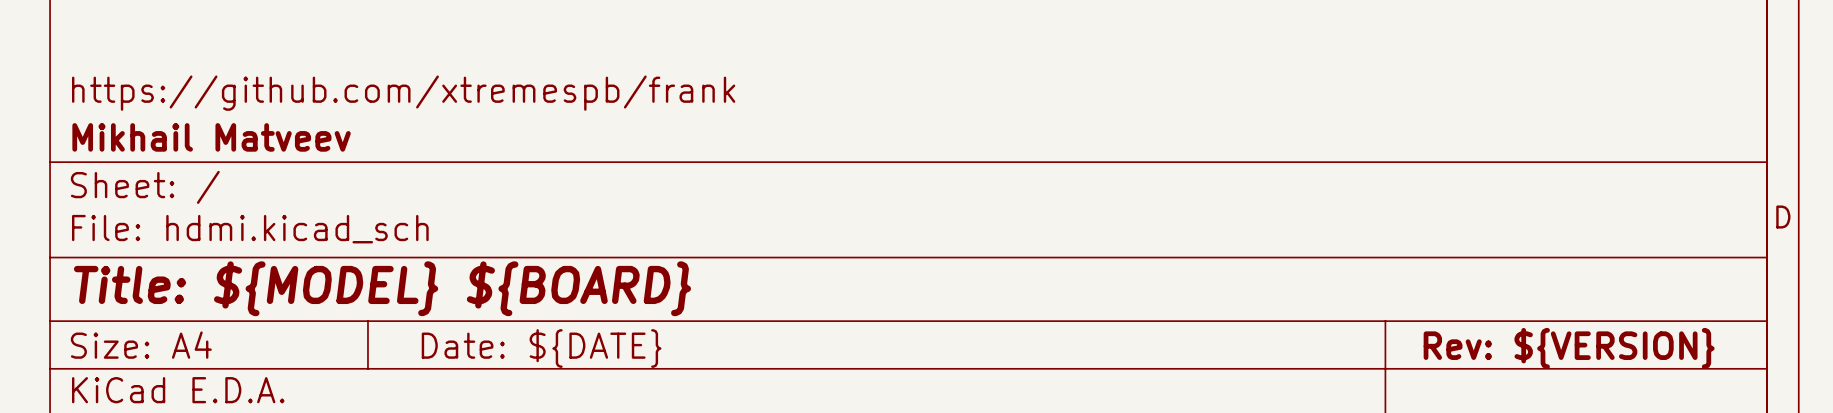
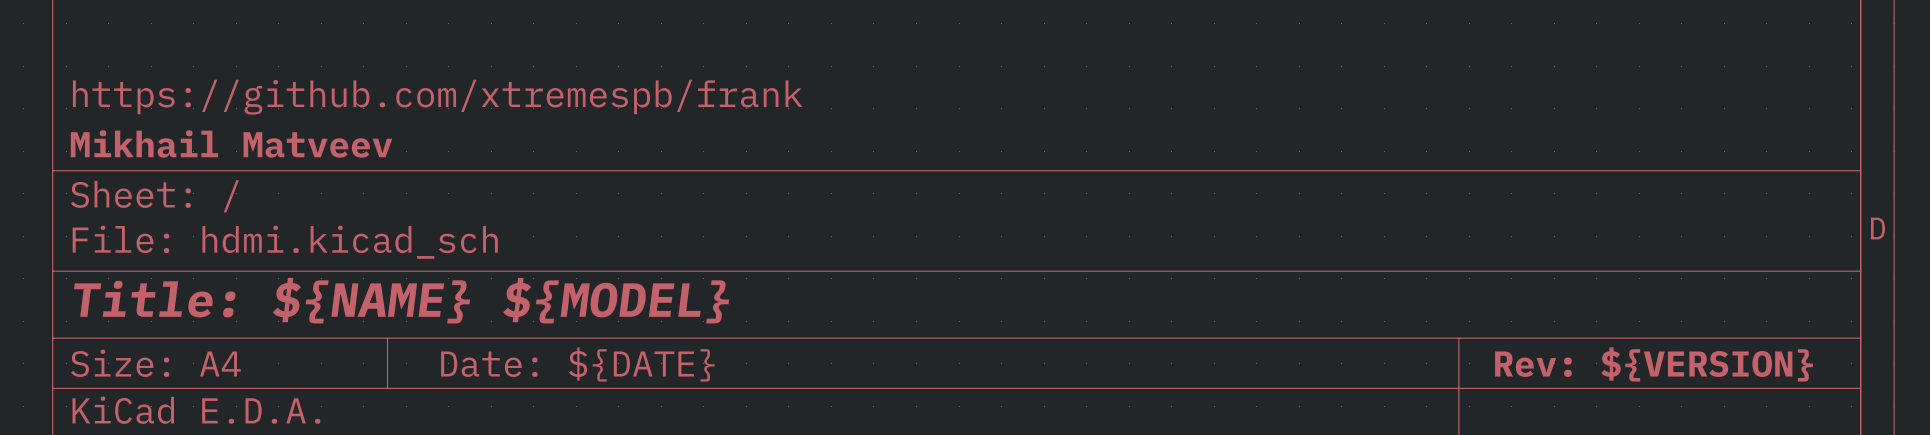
title block: Title: ${MODEL} ${BOARD} (382, 288) -> Title: ${NAME} ${MODEL} (401, 300)

